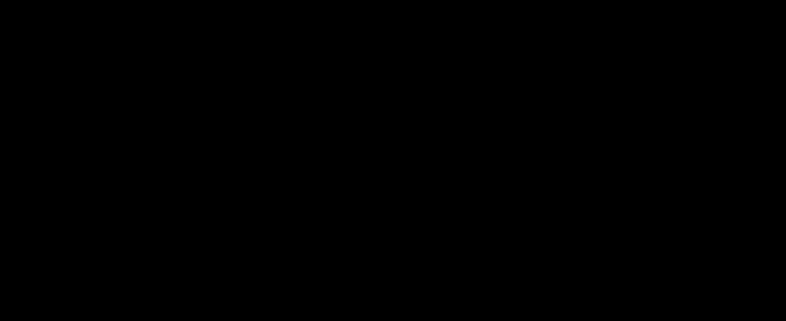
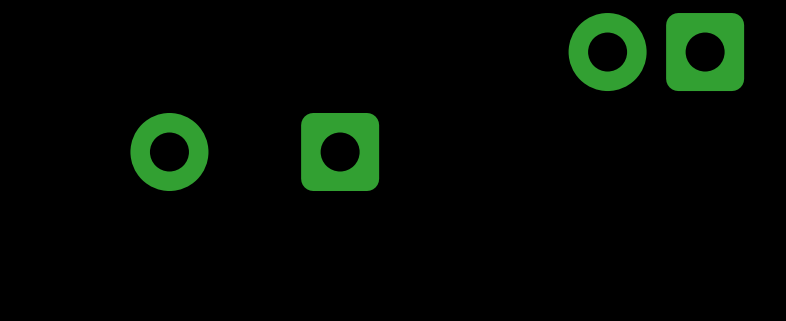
part: none -> (656, 52)
part: none -> (254, 152)

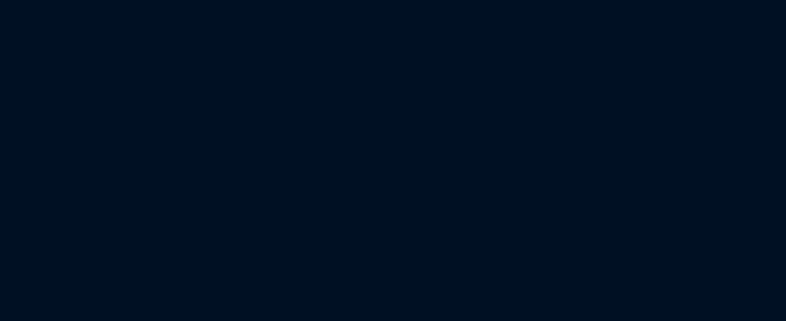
part: (656, 52) -> none
part: (254, 152) -> none

